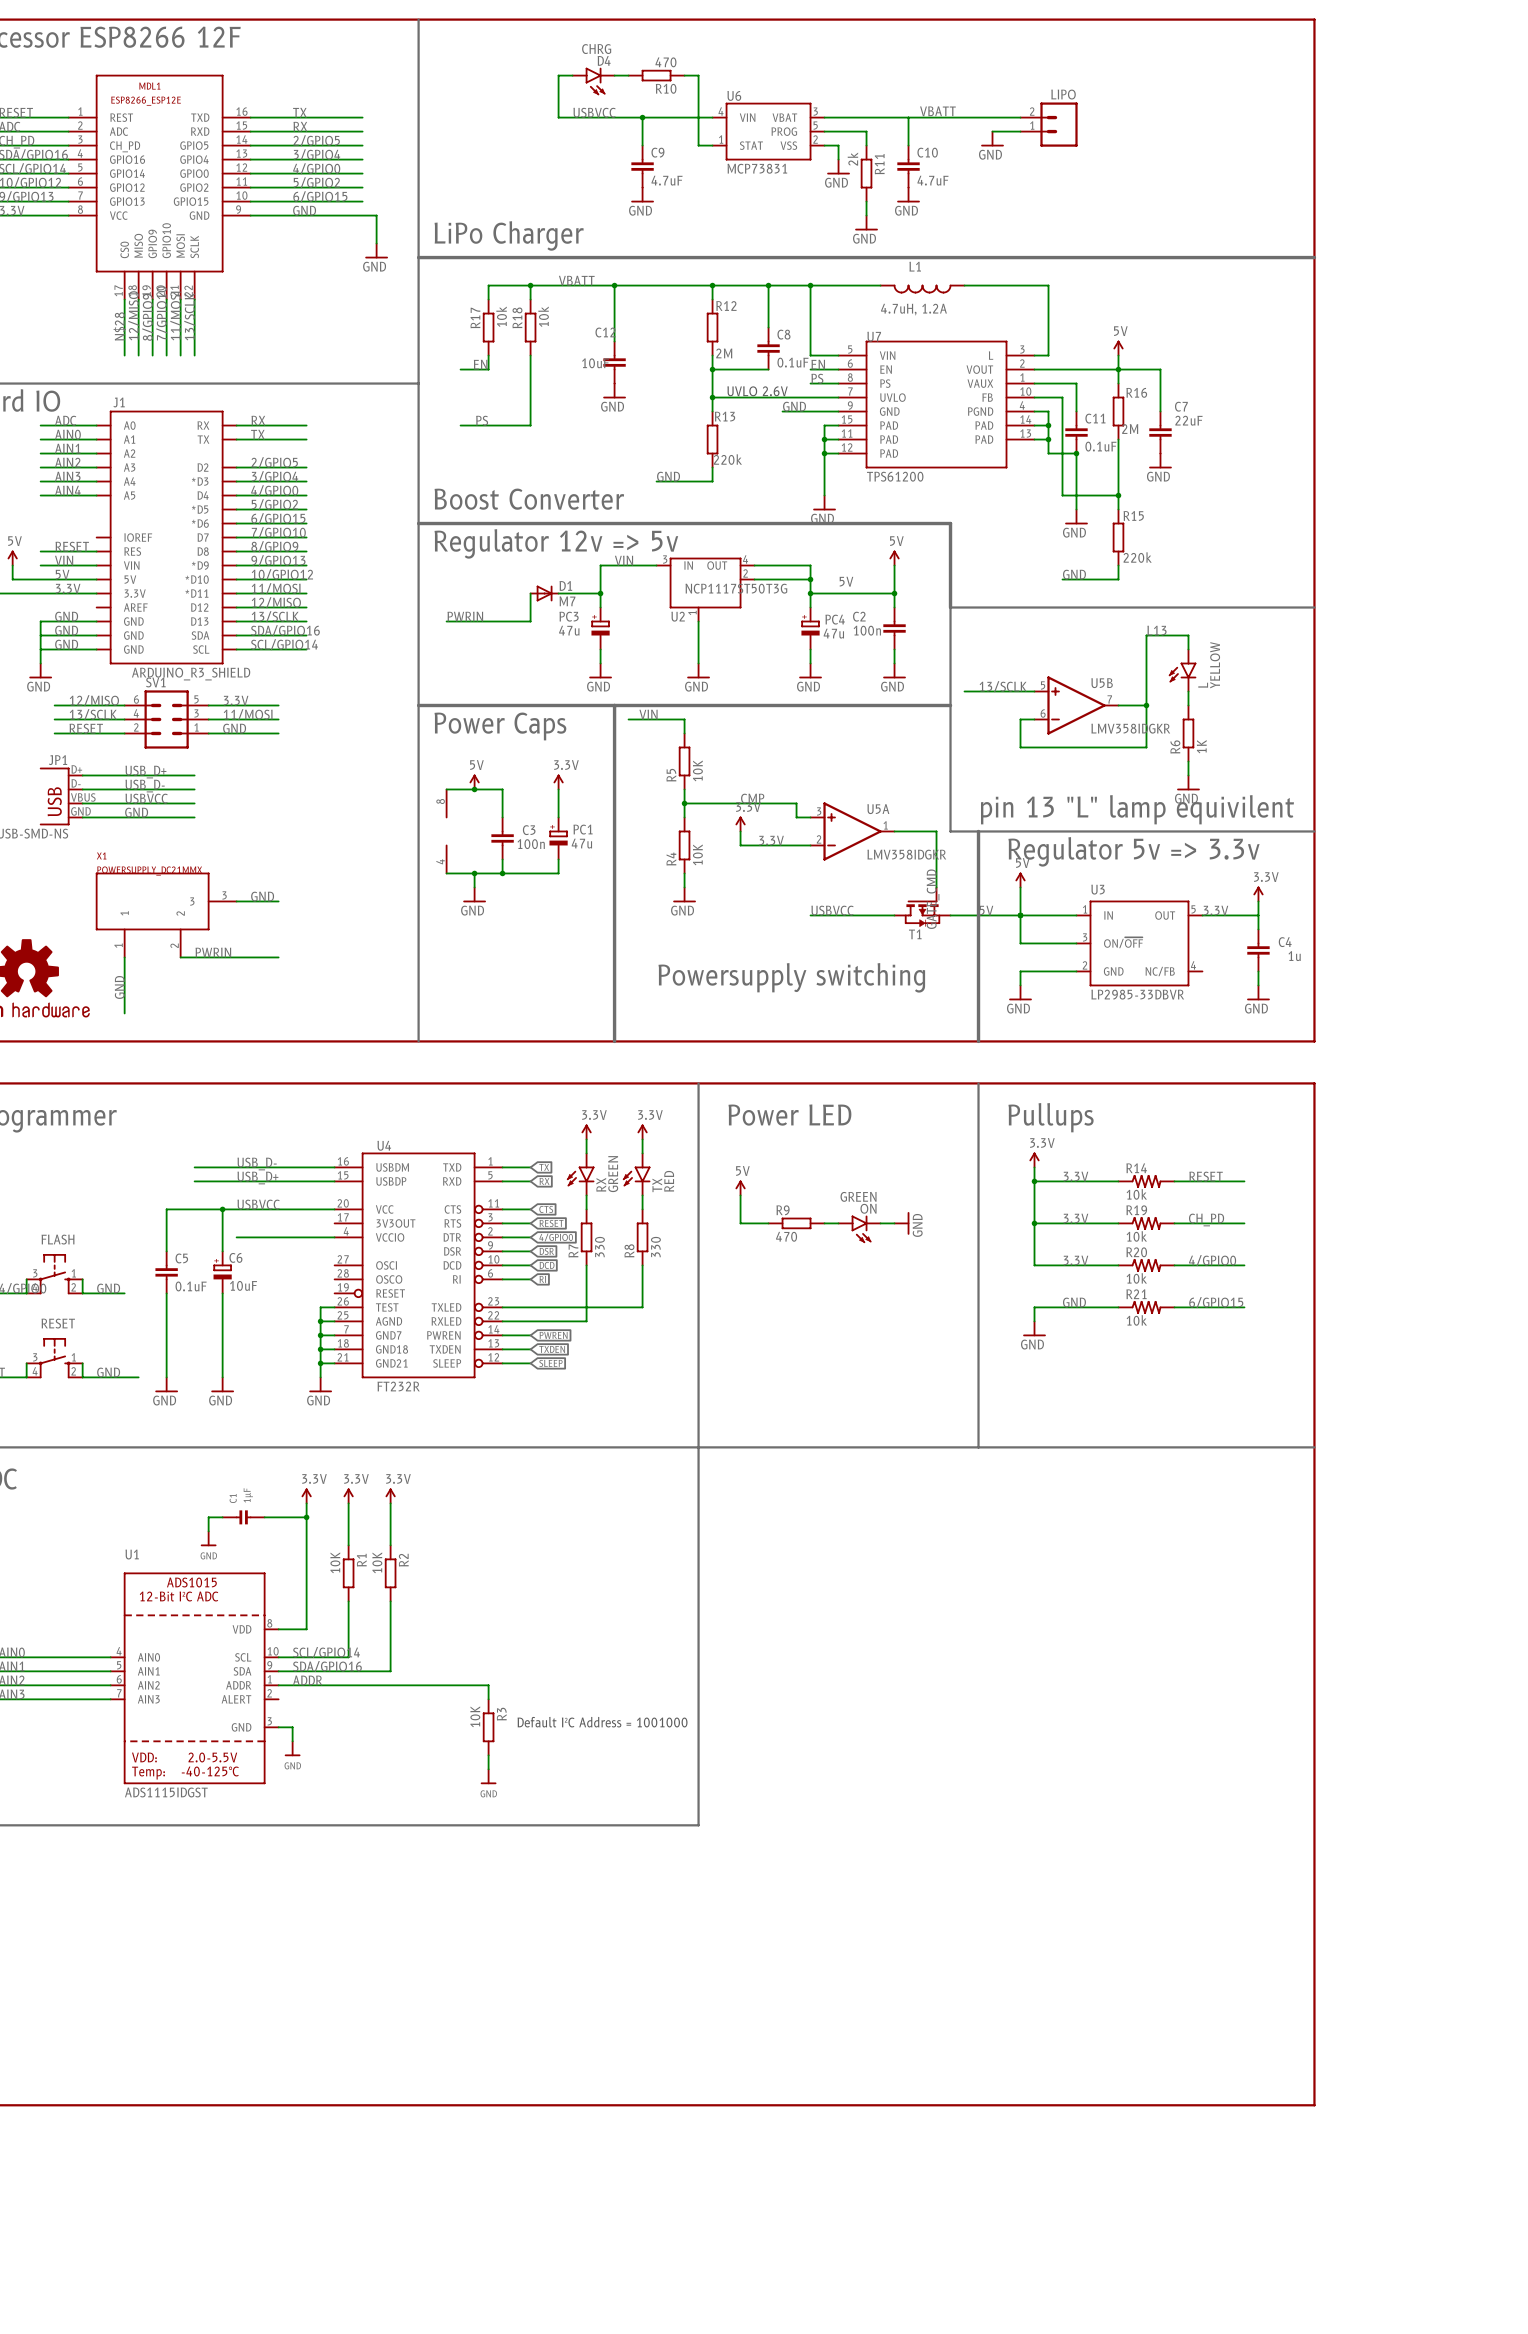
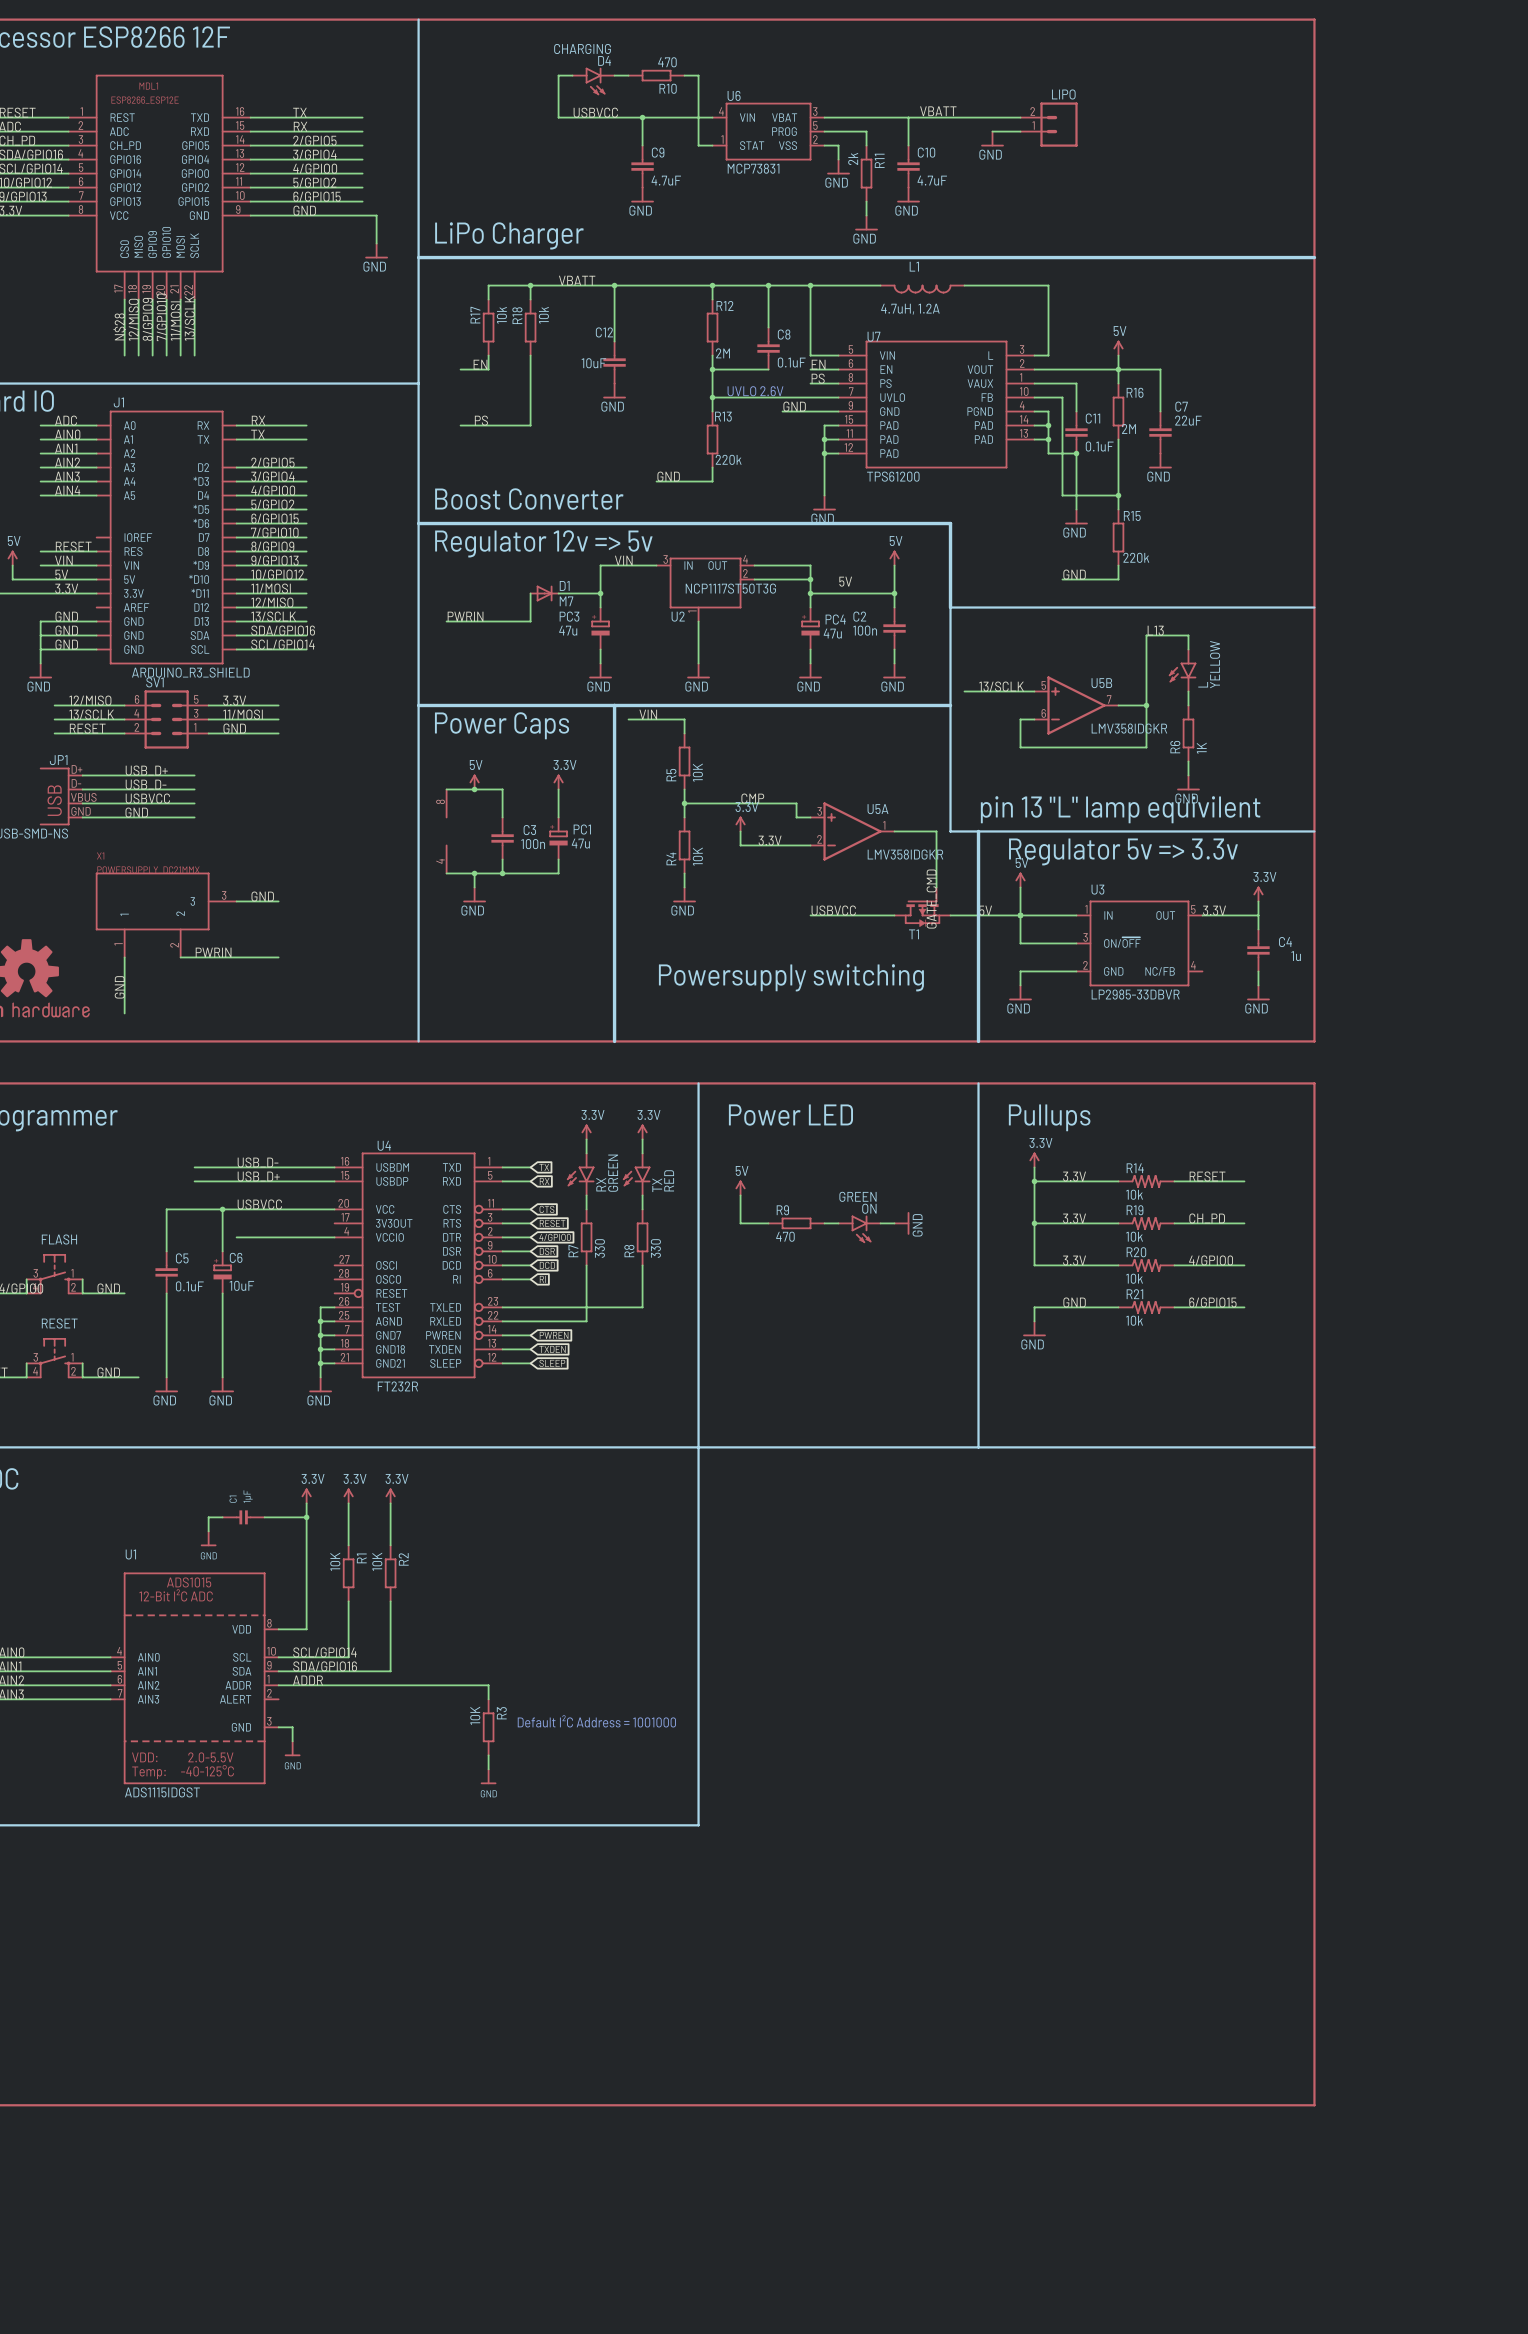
D4 value: CHRG (596, 49) -> CHARGING (582, 49)

